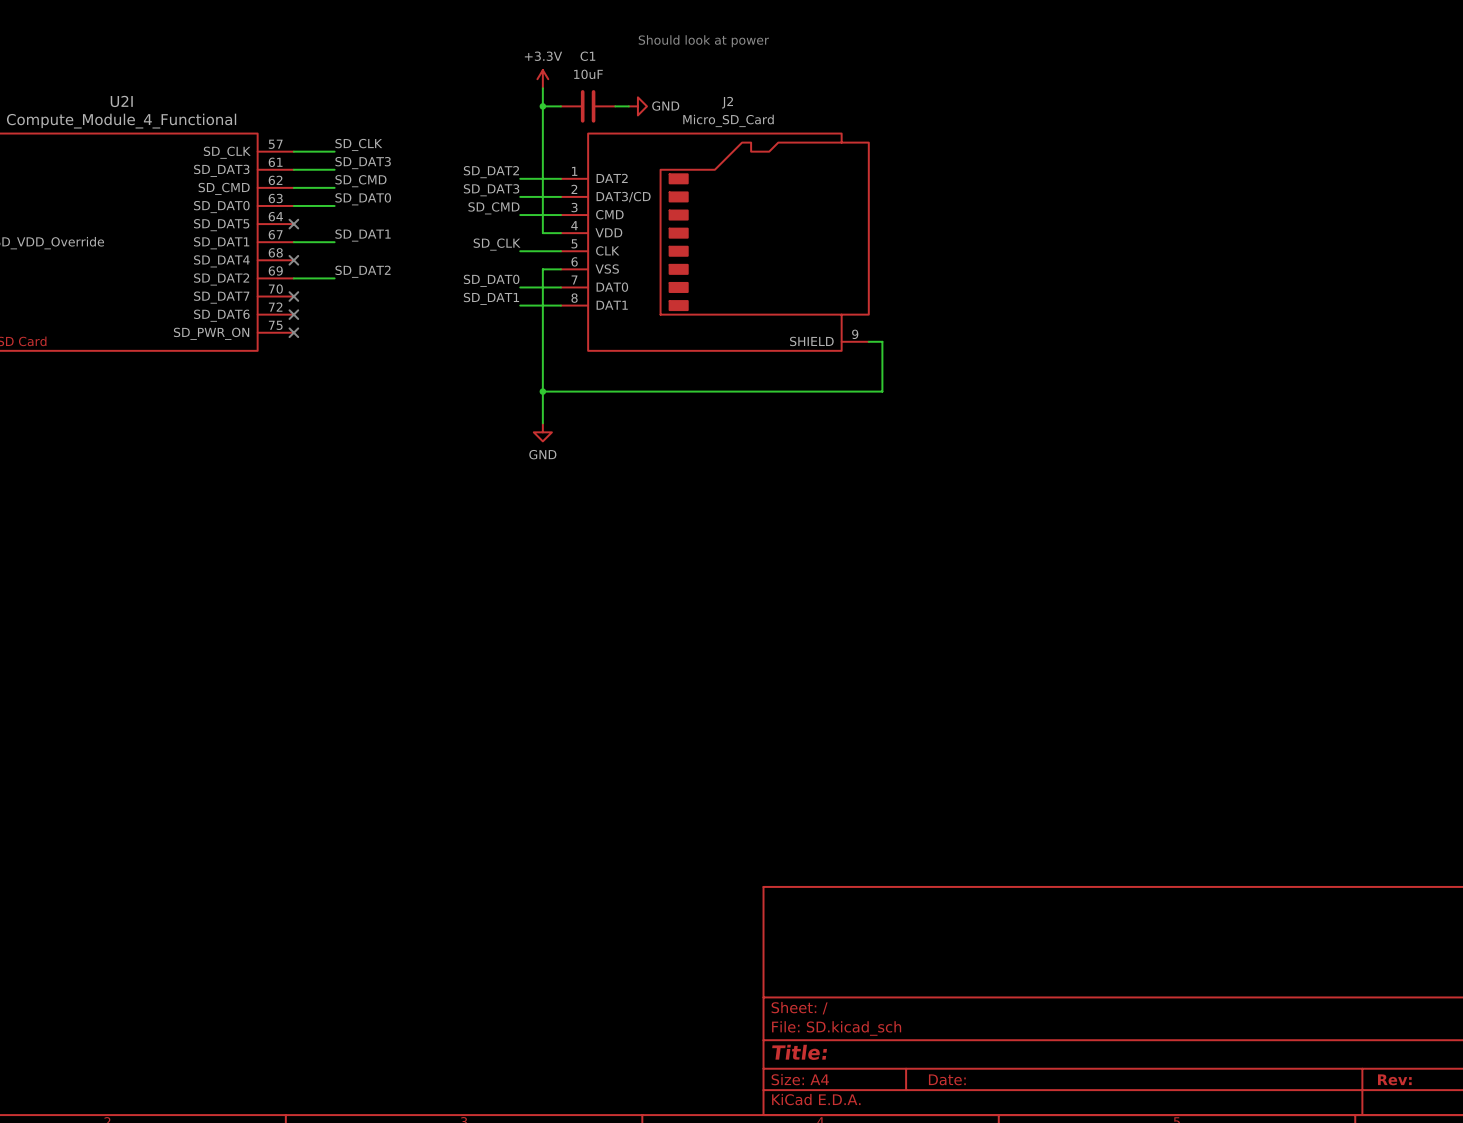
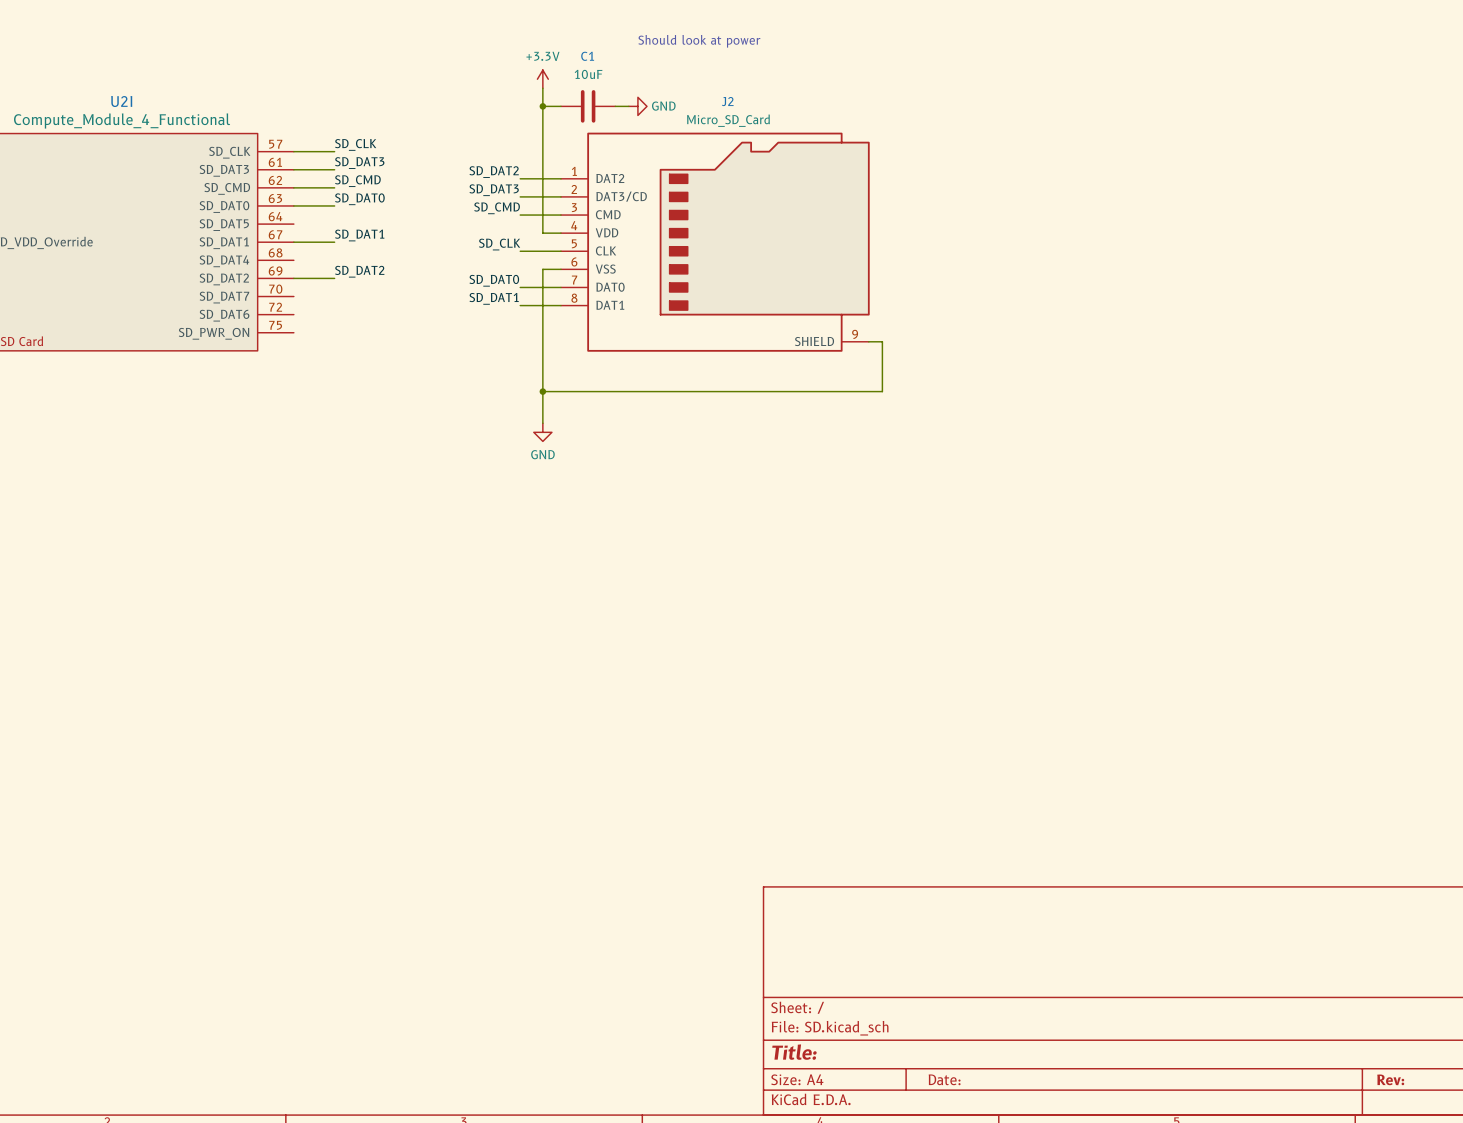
no-connect mark: (293, 224) -> none
no-connect mark: (293, 260) -> none
no-connect mark: (293, 296) -> none
no-connect mark: (293, 314) -> none
no-connect mark: (293, 332) -> none

